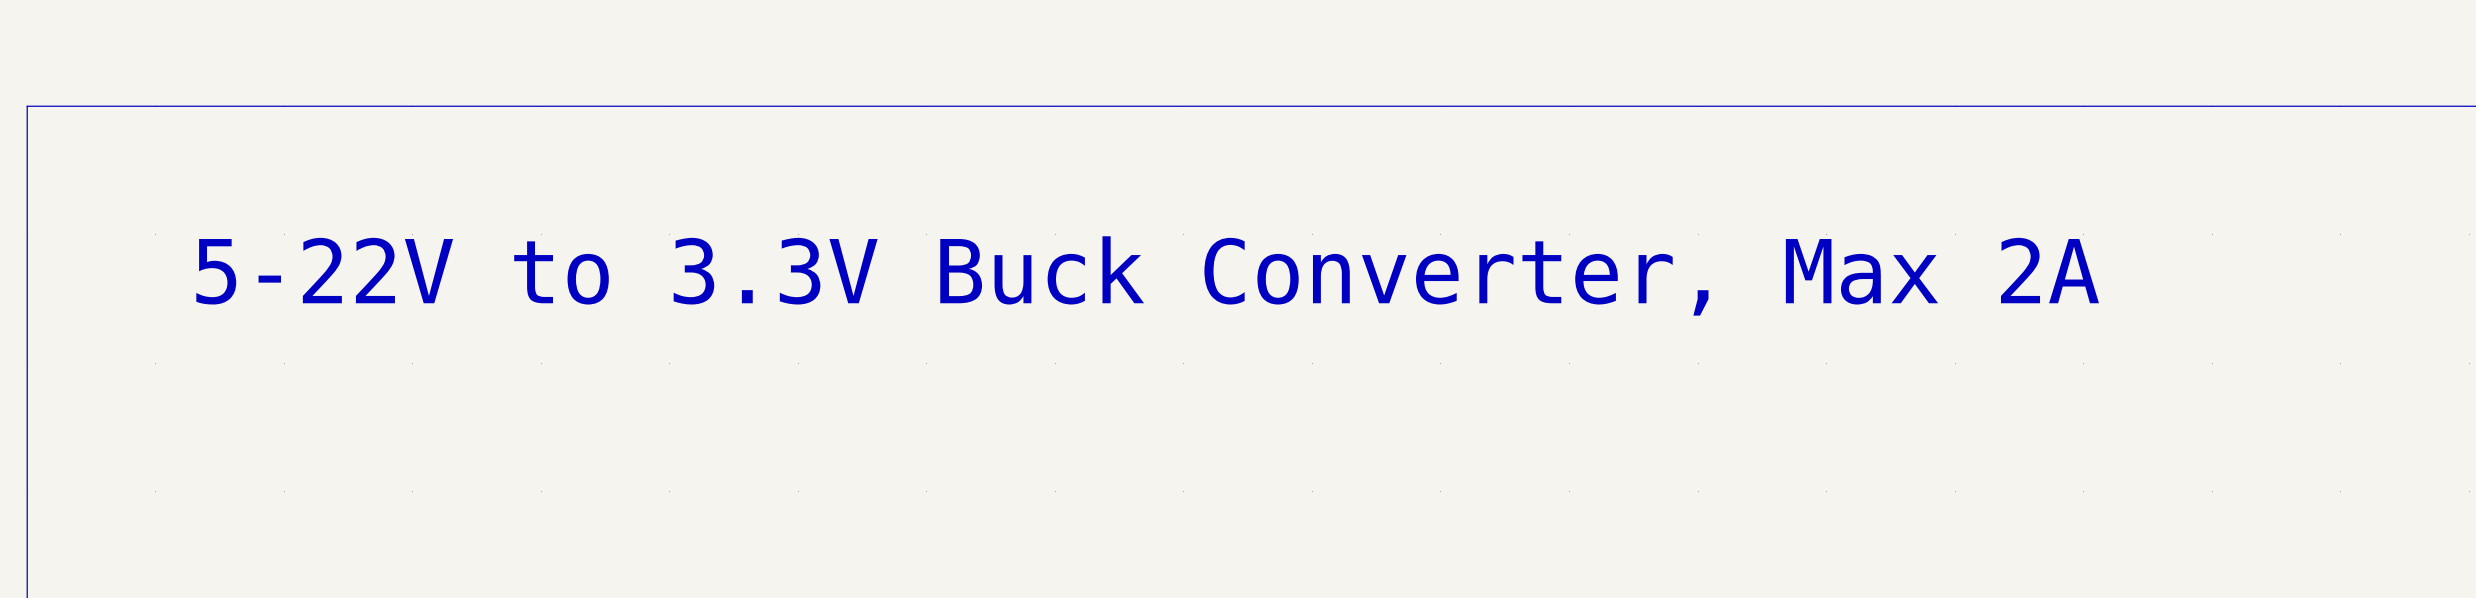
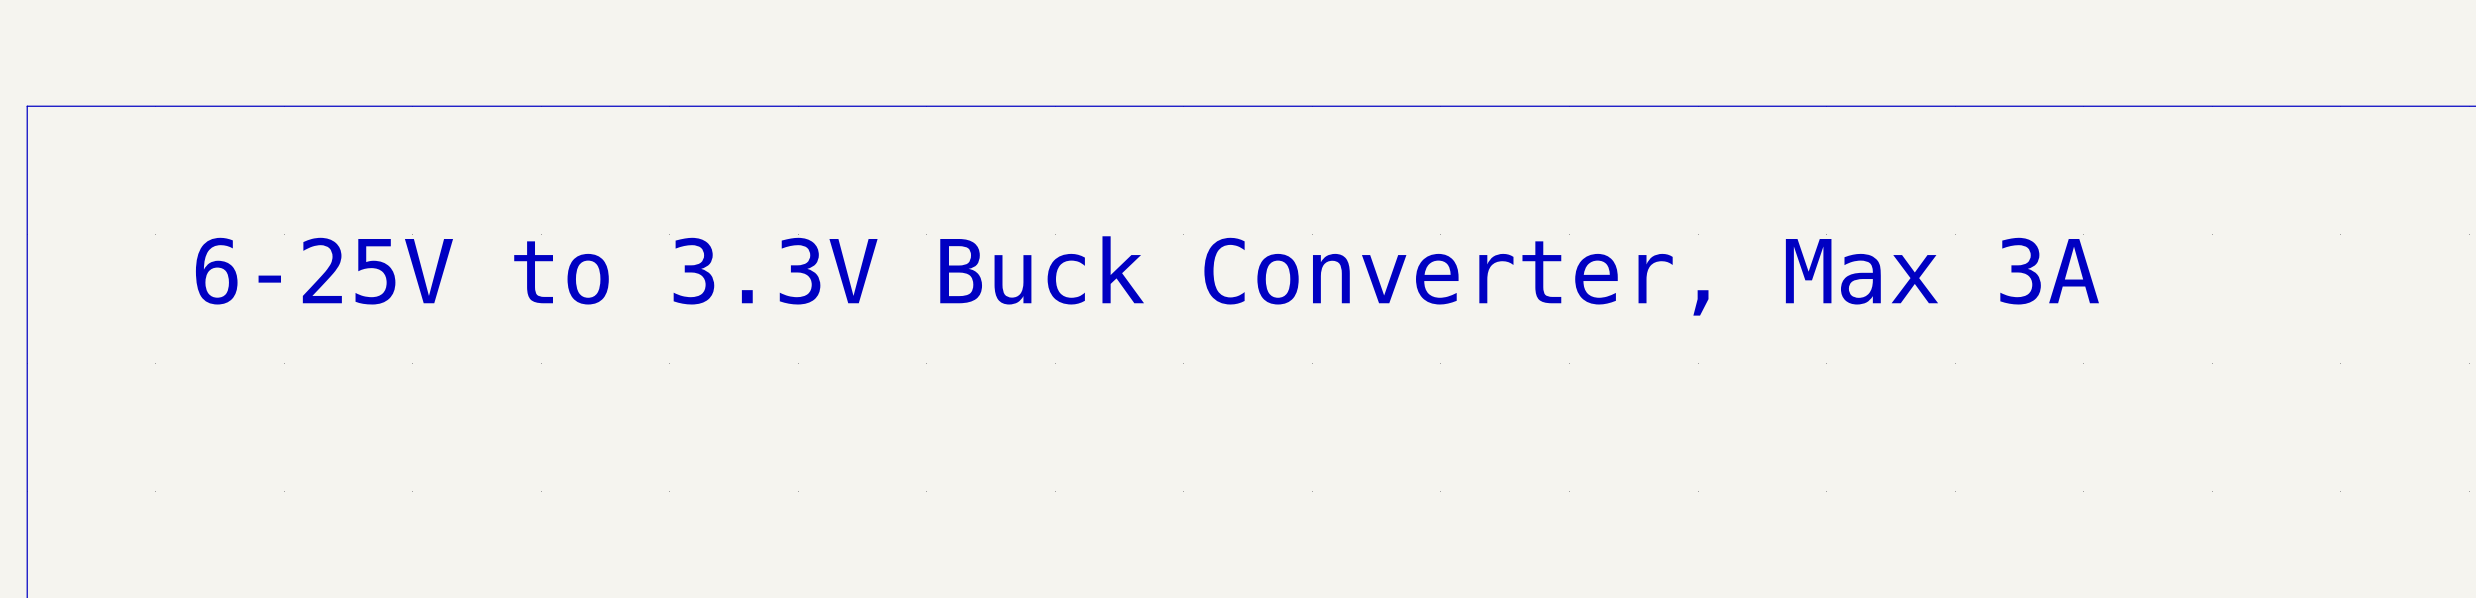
text: 5-22V to 3.3V Buck Converter, Max 2A (1147, 275) -> 6-25V to 3.3V Buck Converter, Max 3A (1147, 275)

